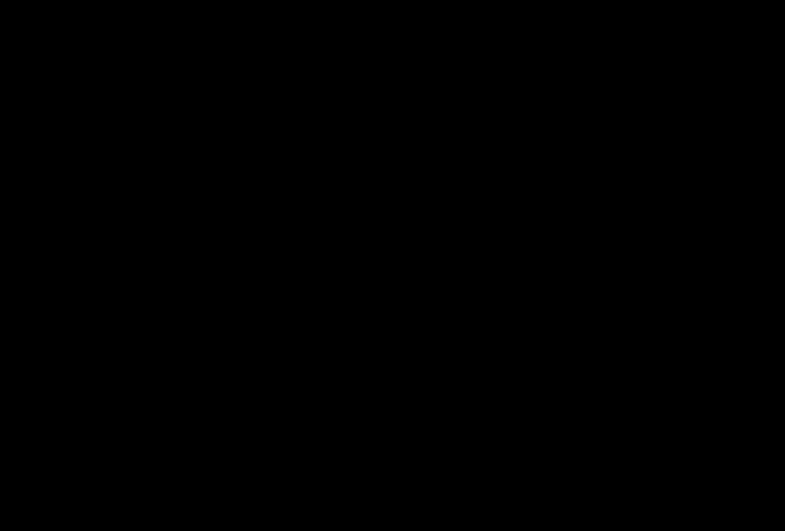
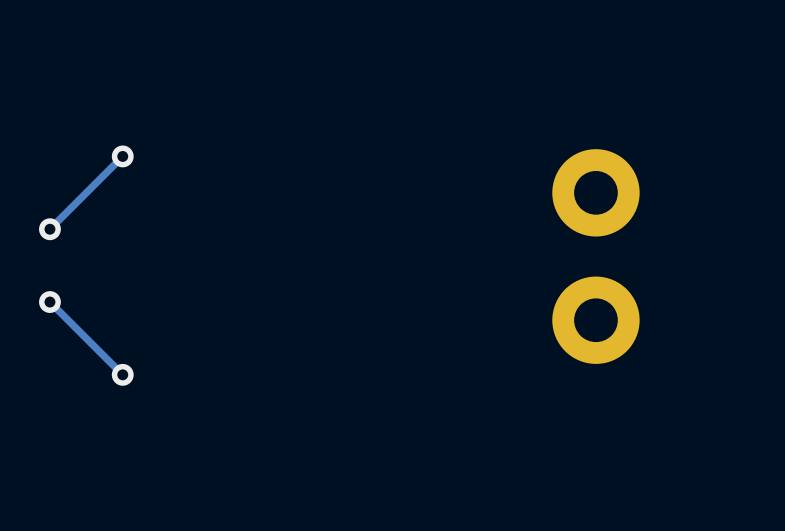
track: none -> (122, 156) (49, 229)
via: none -> (122, 156)
via: none -> (49, 229)
part: none -> (595, 256)
track: none -> (49, 302) (122, 374)
via: none -> (49, 302)
via: none -> (122, 374)

